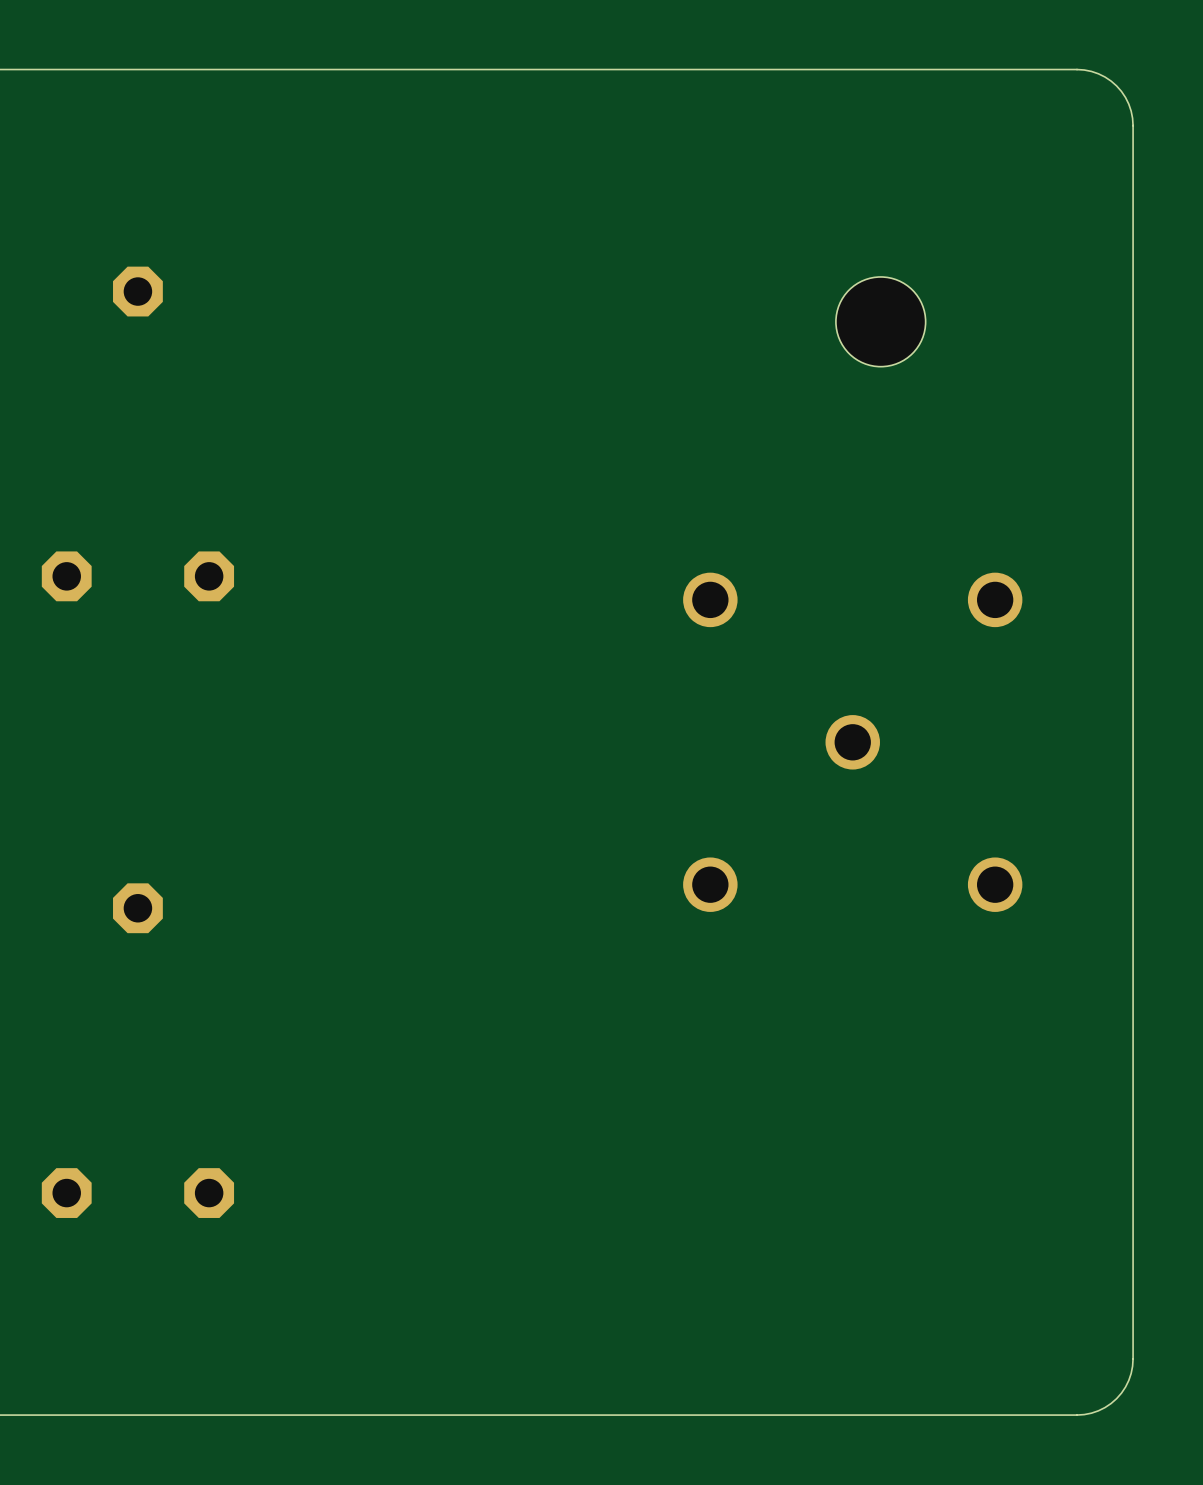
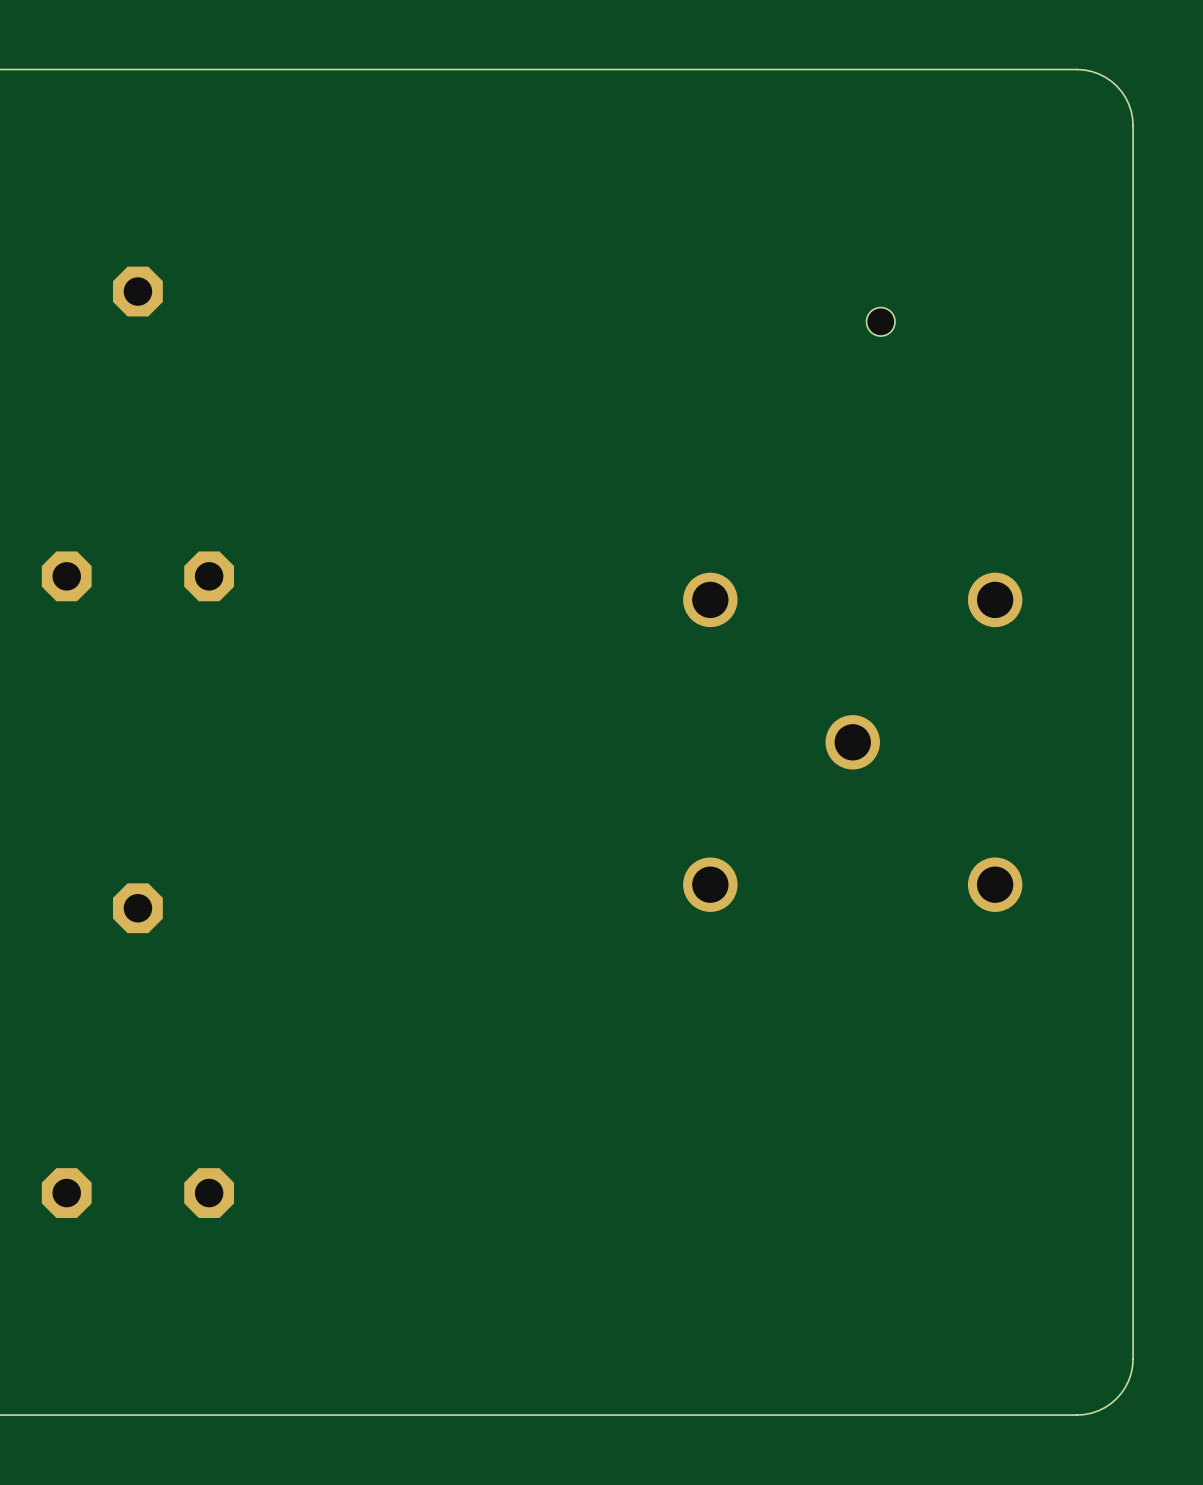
hole size: [835, 276, 926, 367] -> [866, 307, 896, 337]

